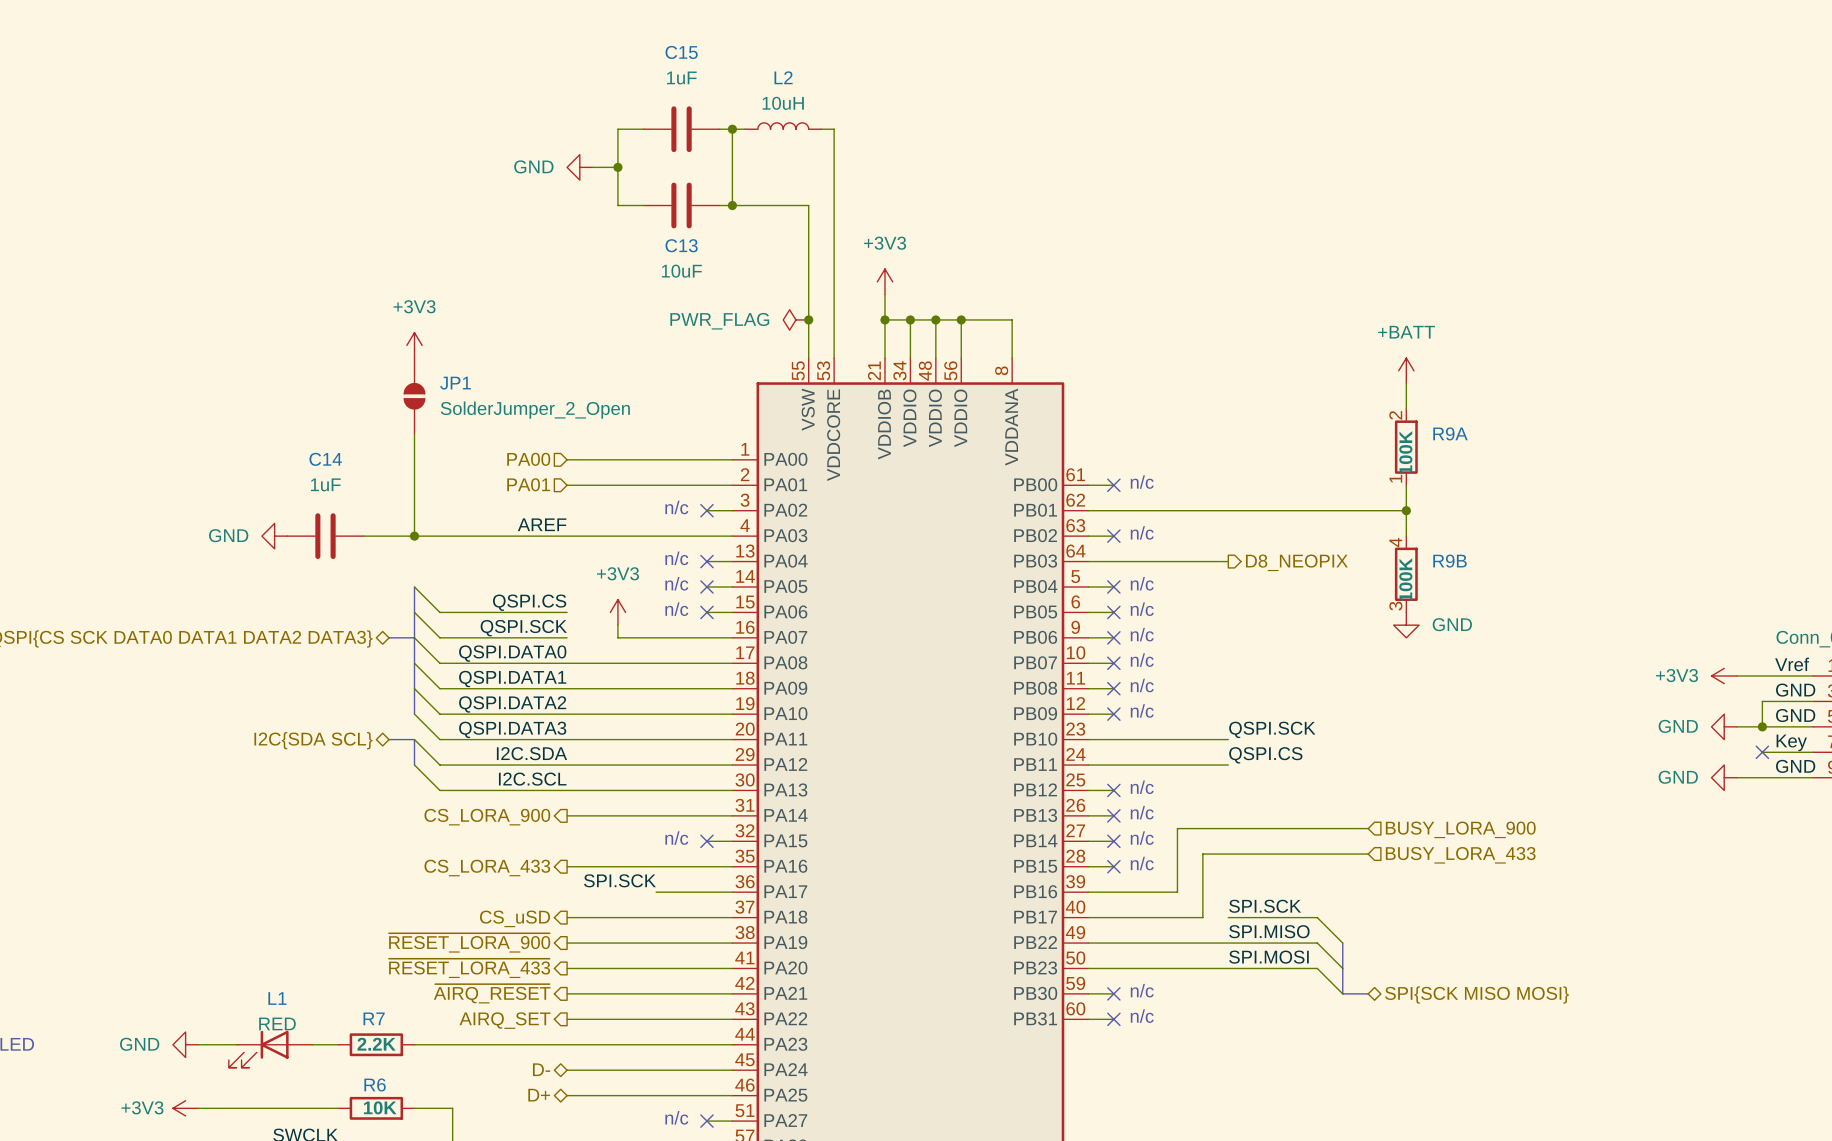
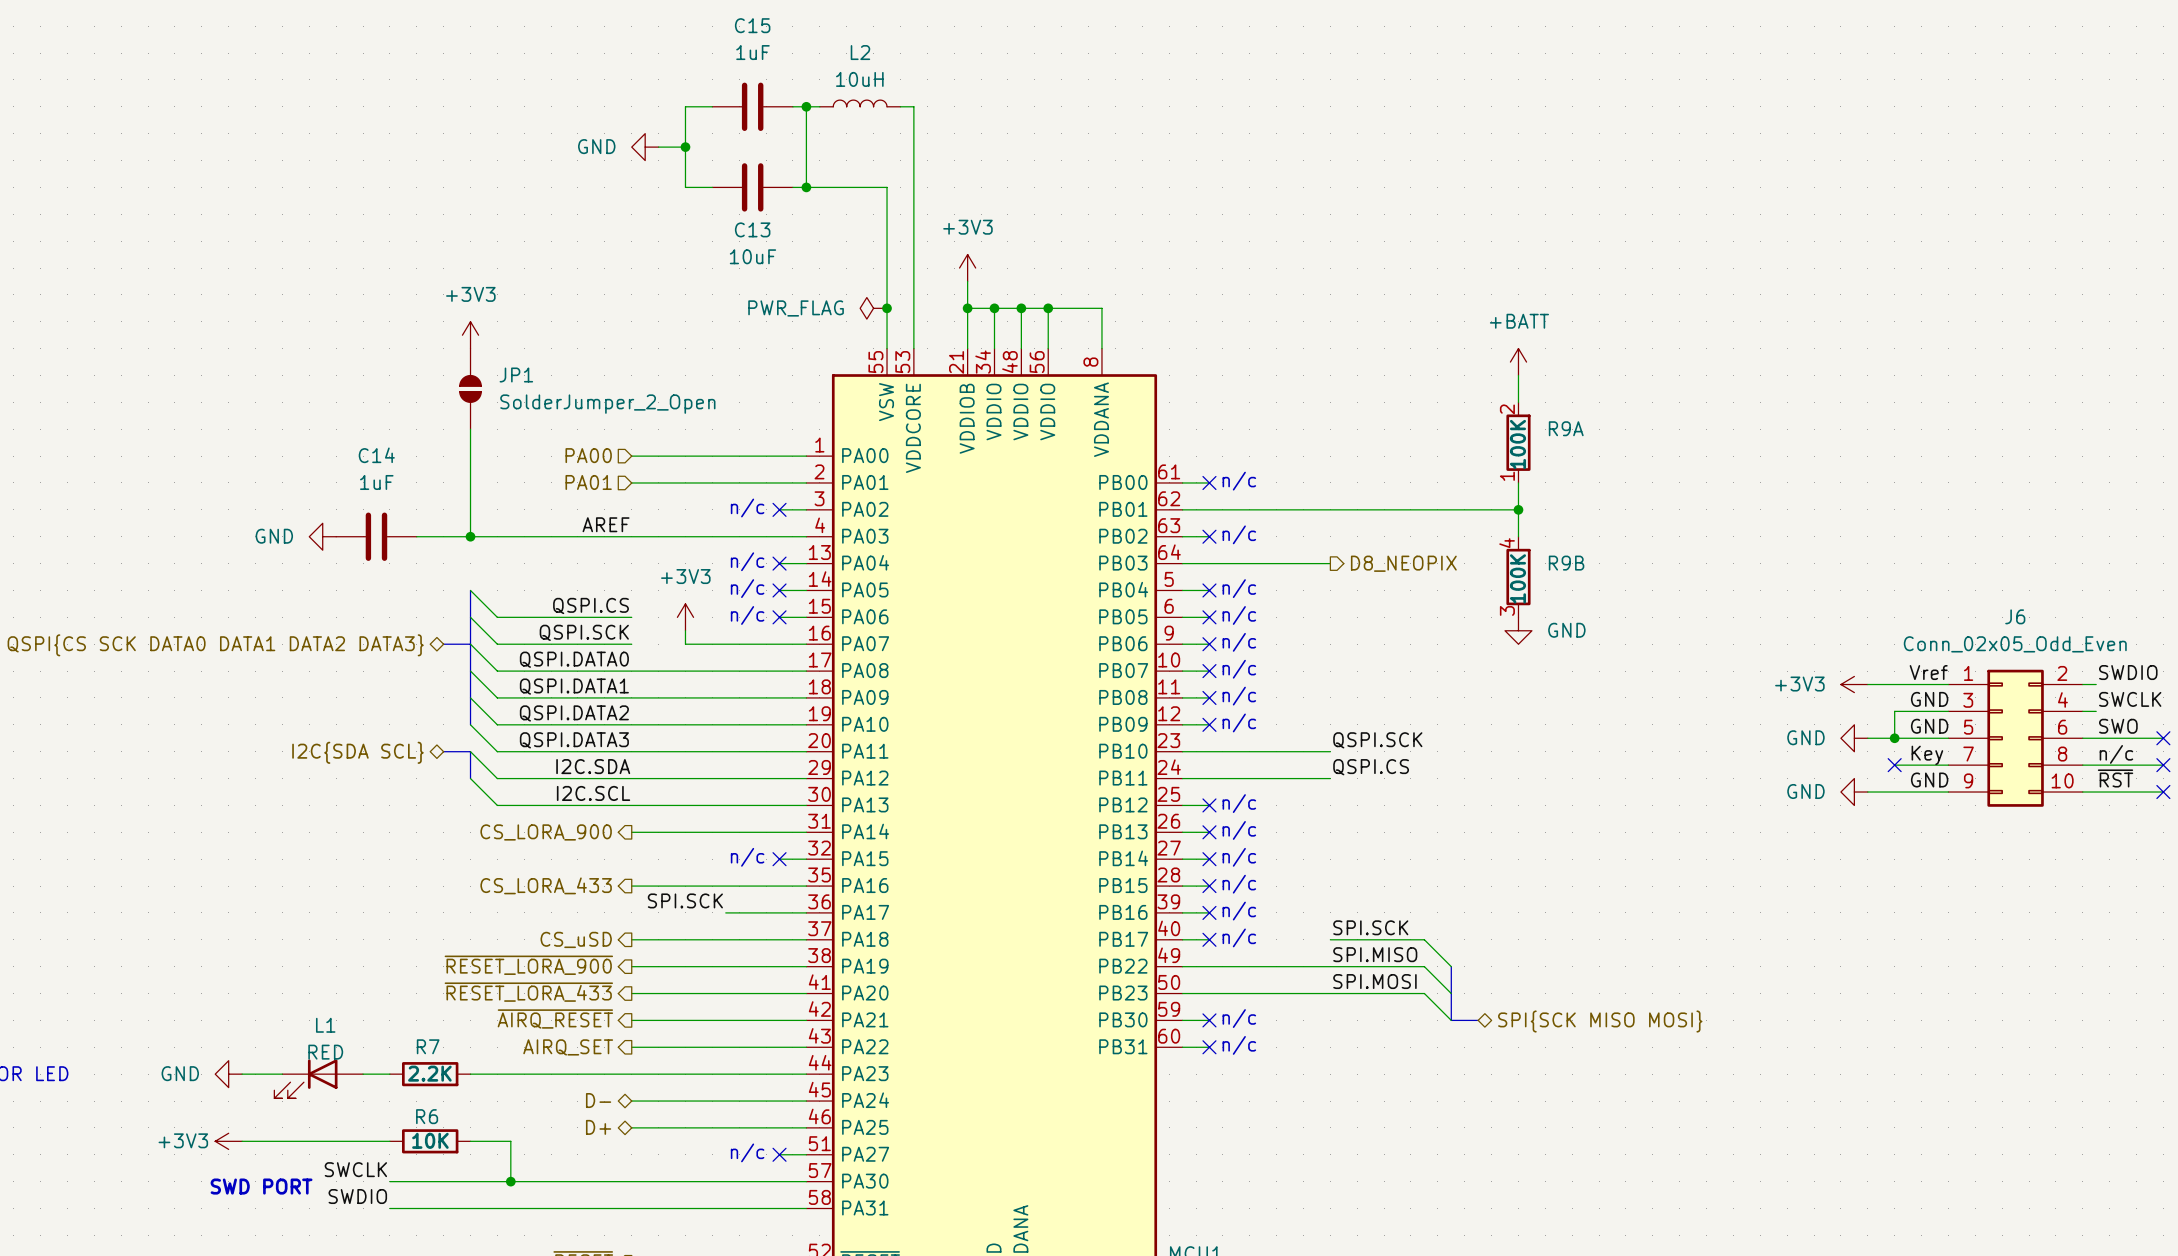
wire: (1368, 828) (1177, 828) (1177, 892) (1113, 892) -> none
hierarchical label: BUSY_LORA_900 (1460, 829) -> none
wire: (1368, 854) (1202, 854) (1202, 917) (1113, 917) -> none
hierarchical label: BUSY_LORA_433 (1460, 855) -> none
text: none -> n/c (1239, 911)
no-connect mark: none -> (1209, 912)
text: none -> n/c (1239, 937)
no-connect mark: none -> (1209, 939)

